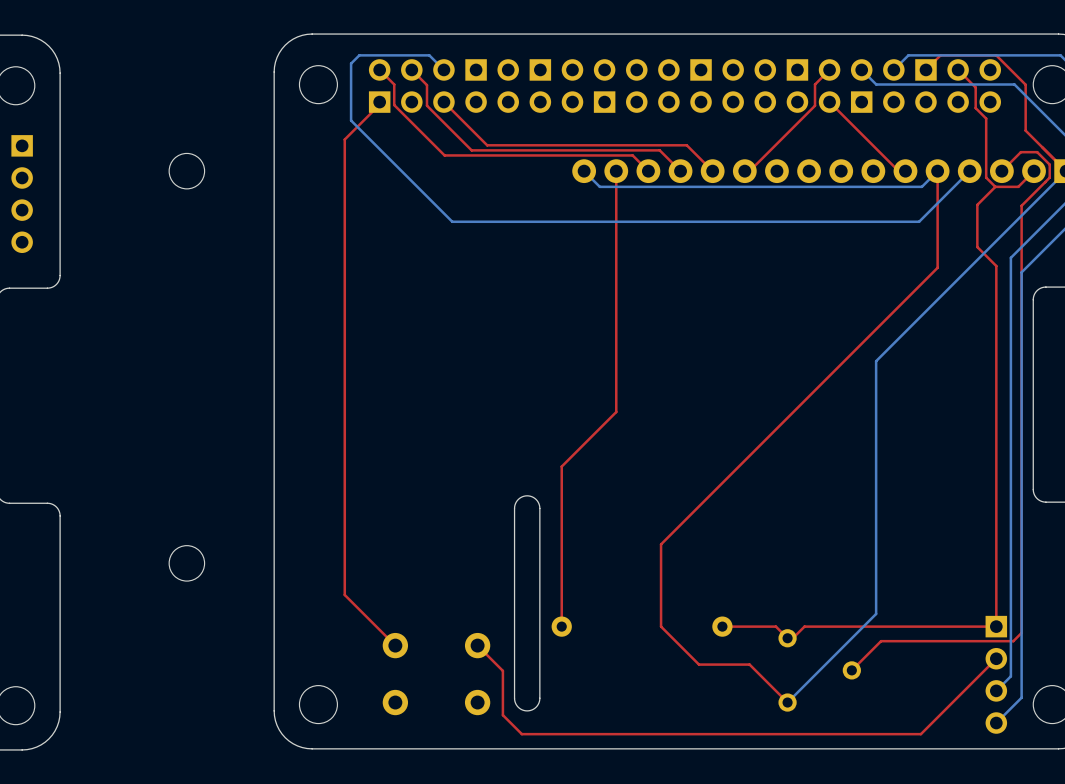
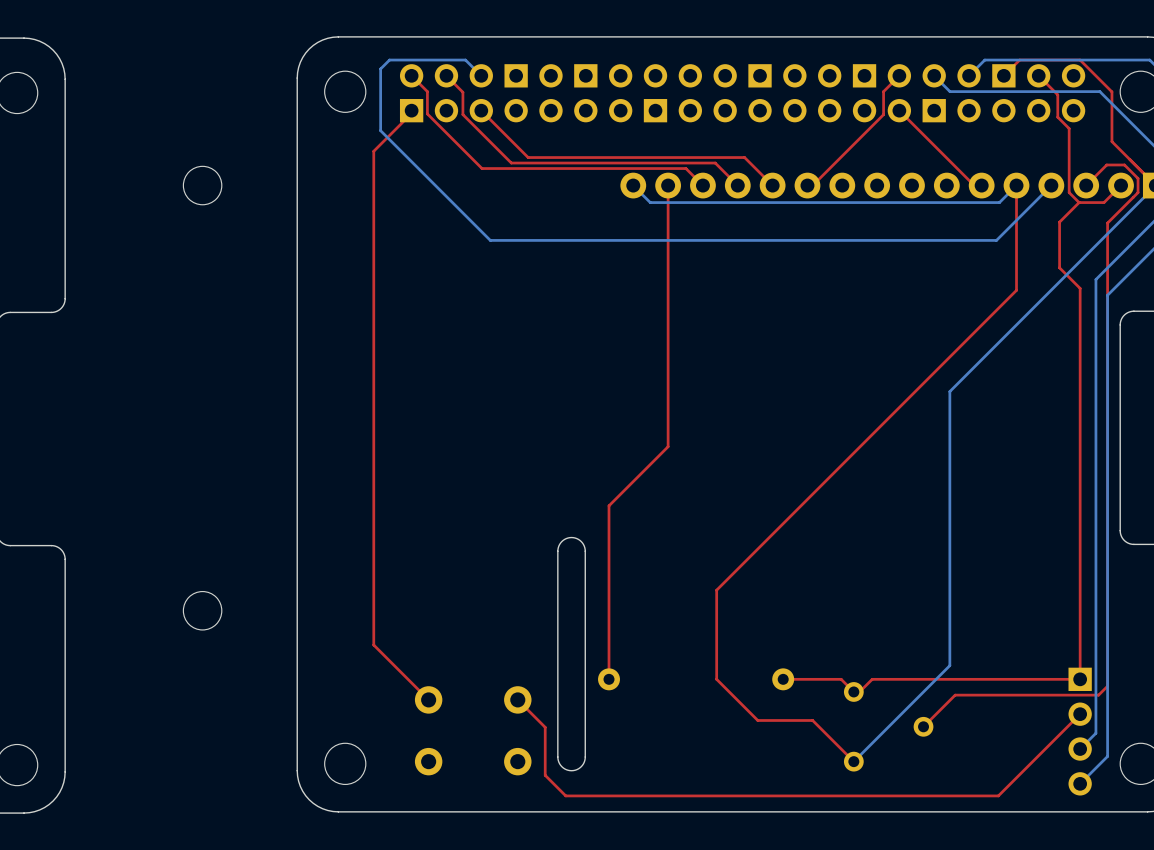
part: (22, 194) -> none

